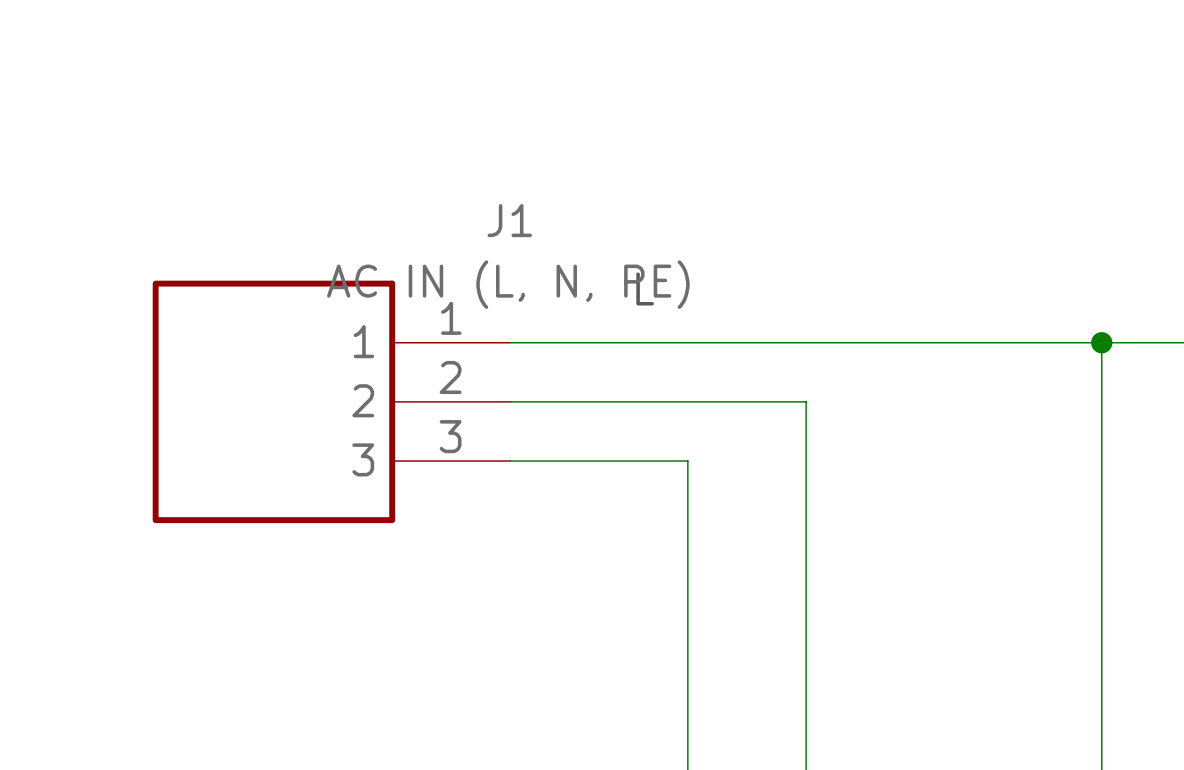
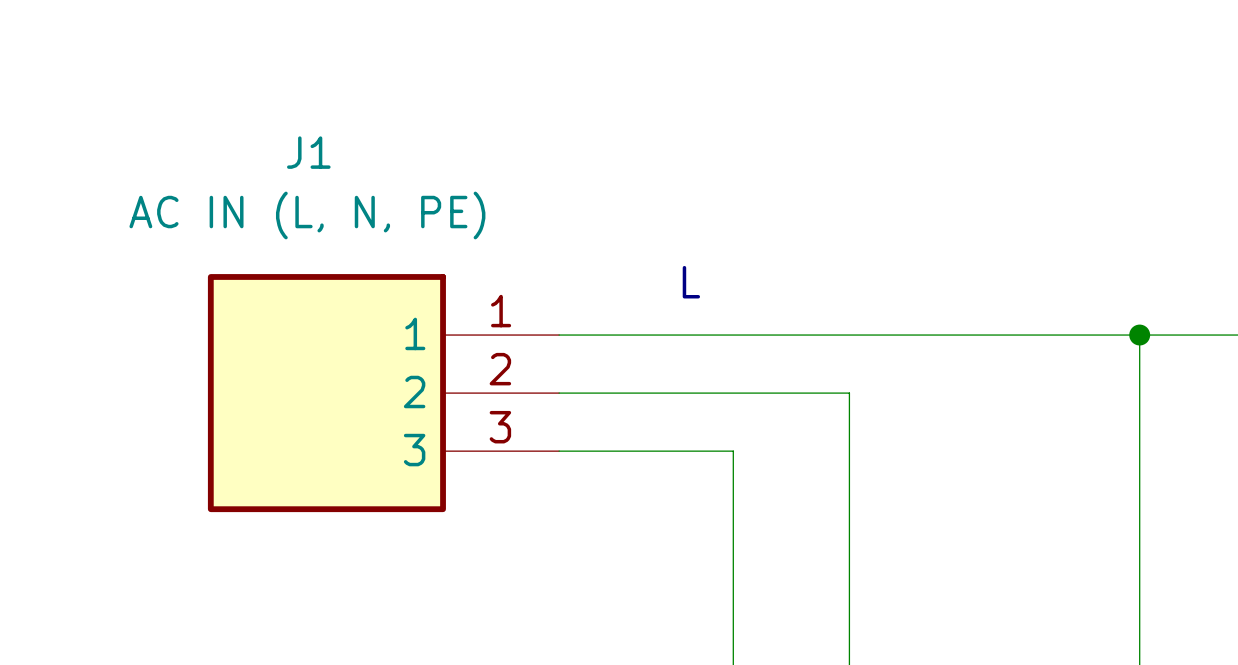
J1 name position: J1 (509, 220) -> J1 (308, 152)
J1 value position: AC IN (L, N, PE) (508, 284) -> AC IN (L, N, PE) (307, 215)

